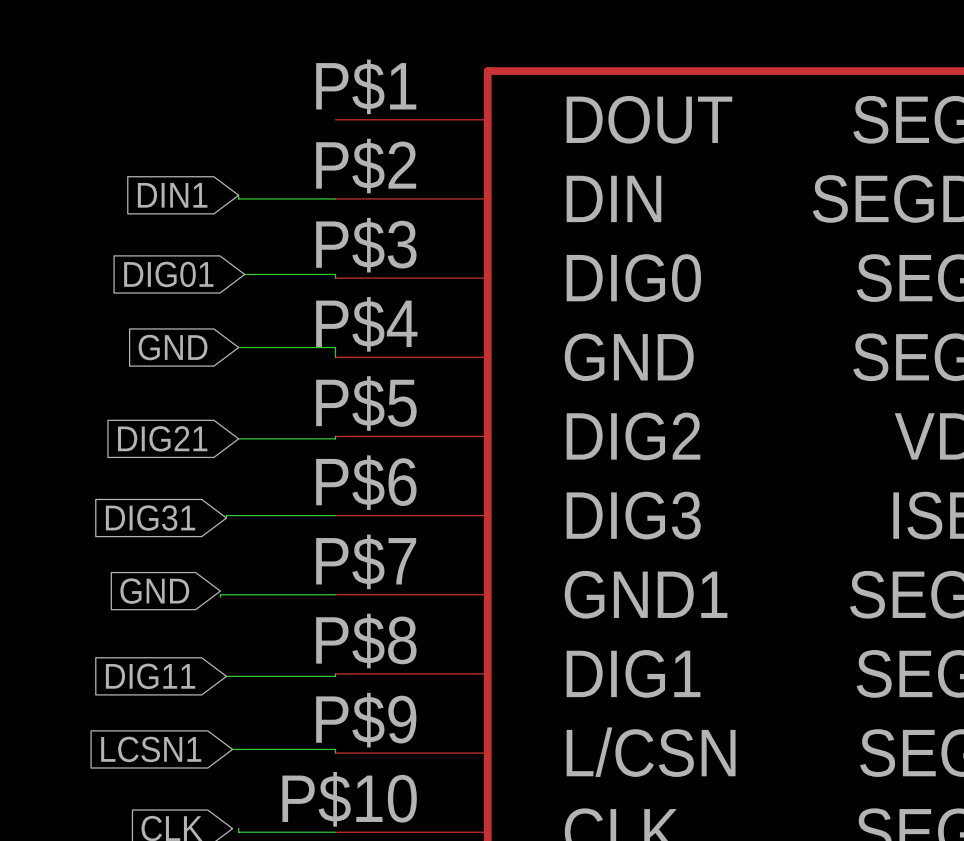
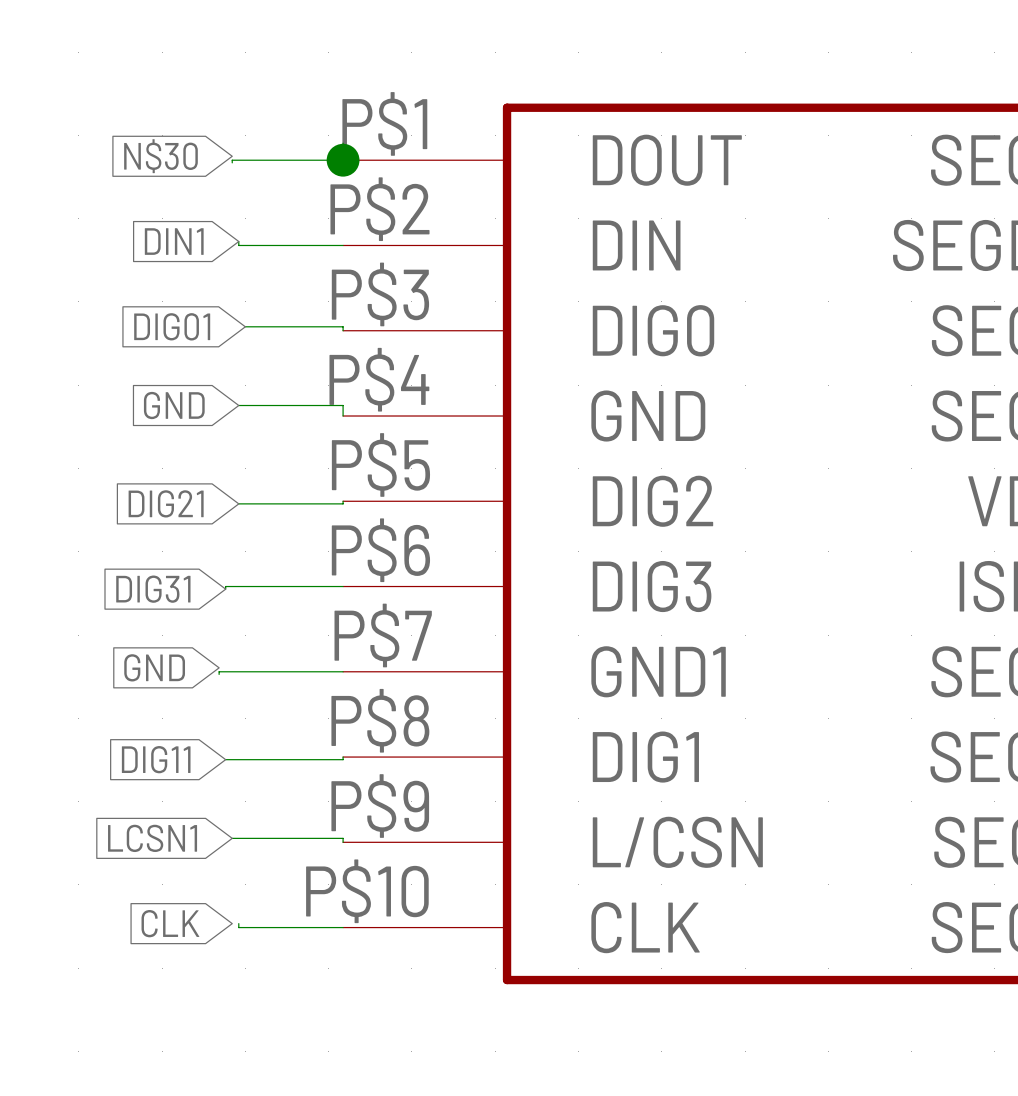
wire: none -> (343, 143) (343, 160) (232, 160) (232, 162)
global label: none -> N$30 (160, 156)
junction: none -> (343, 160)

